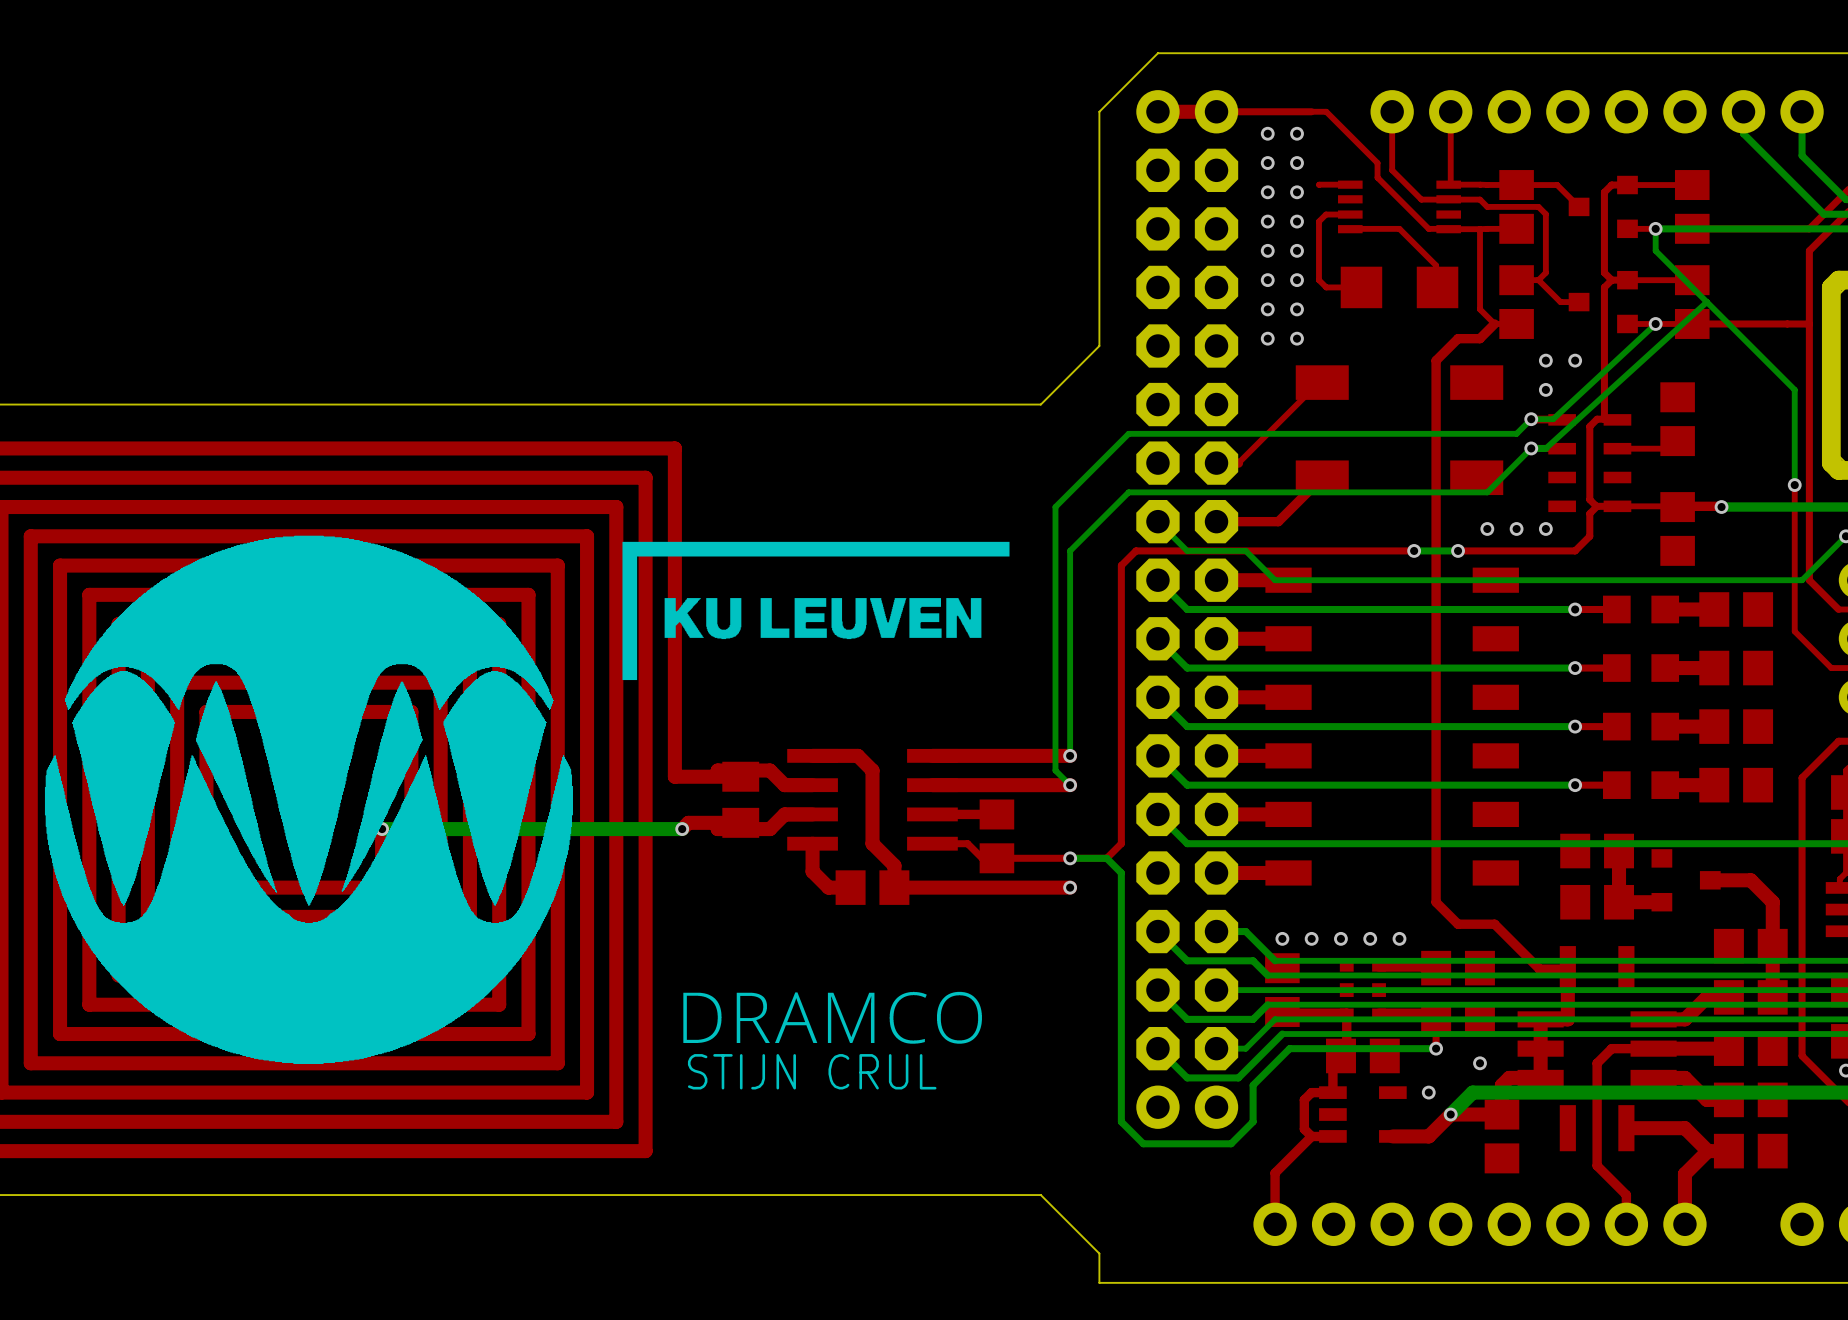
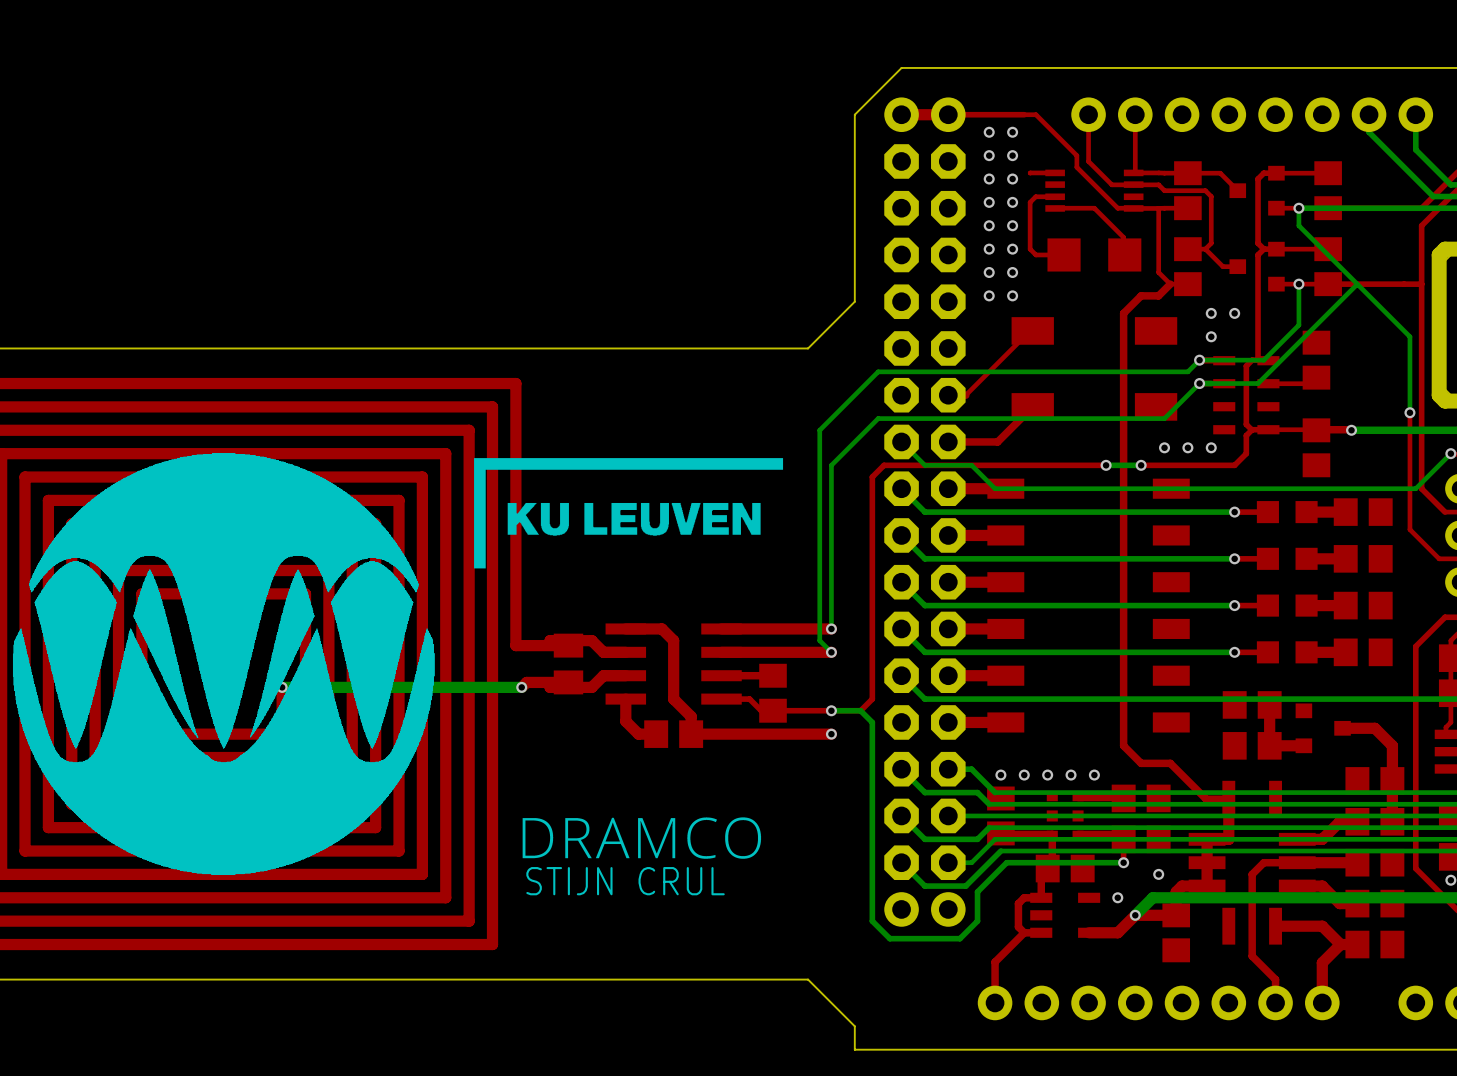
bottom track: (1706, 302) (1545, 448) -> none
bottom track: (1655, 324) (1553, 419) -> (1298, 284) (1298, 325) (1263, 360) (1217, 360)
bottom track: none -> (1357, 284) (1258, 383) (1199, 383)

